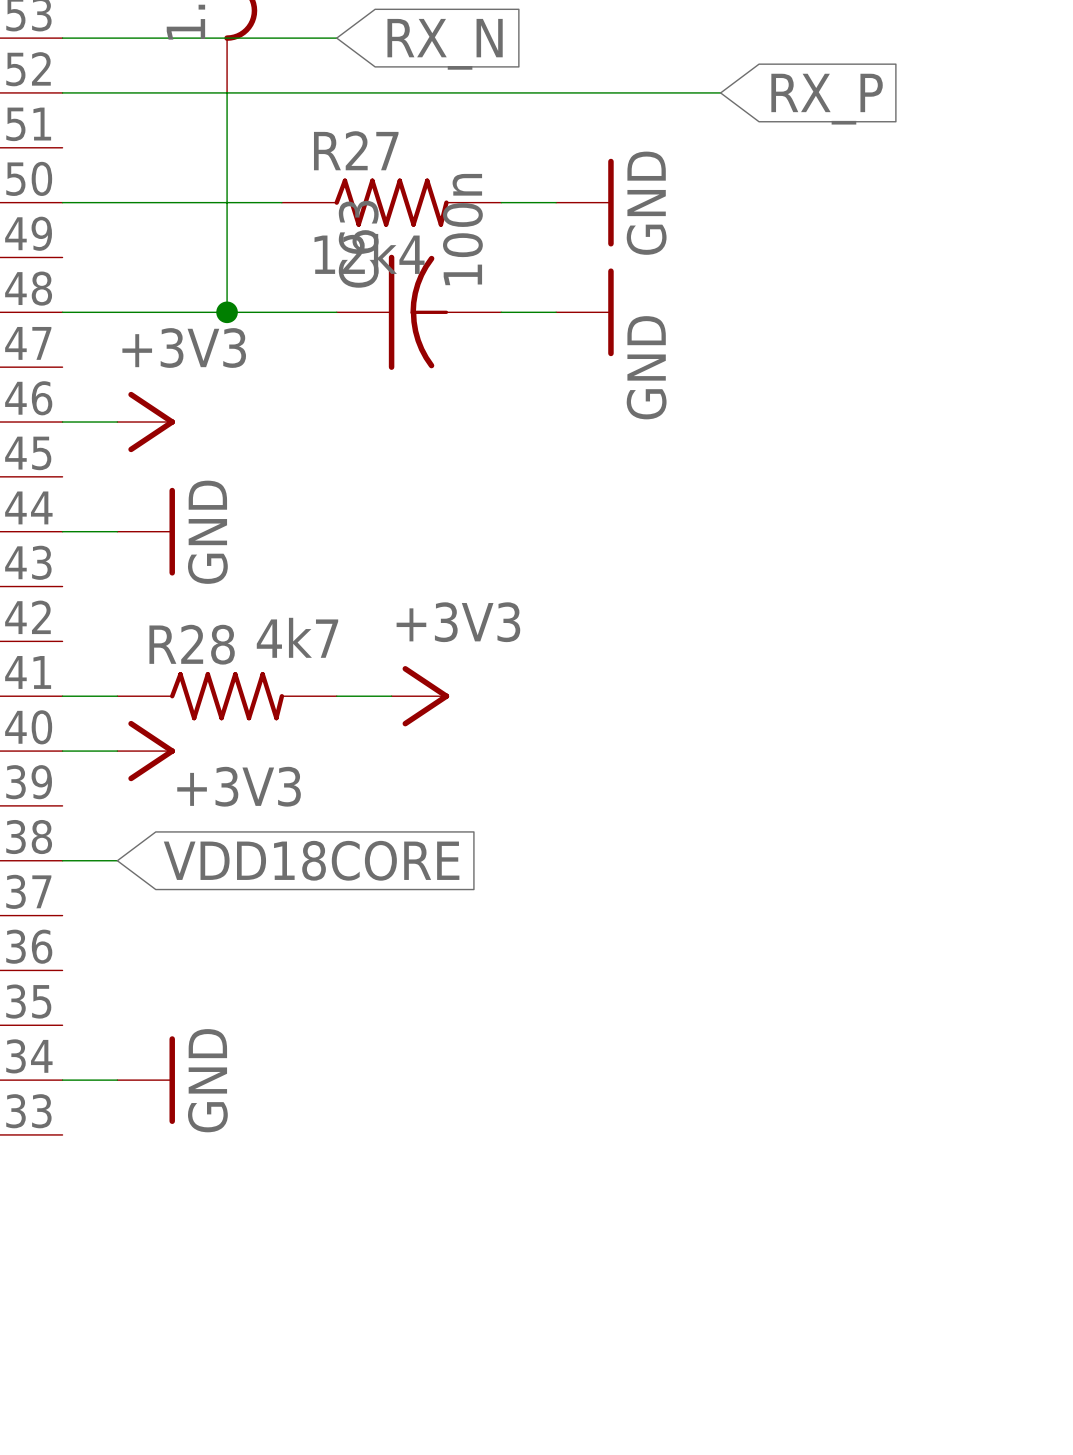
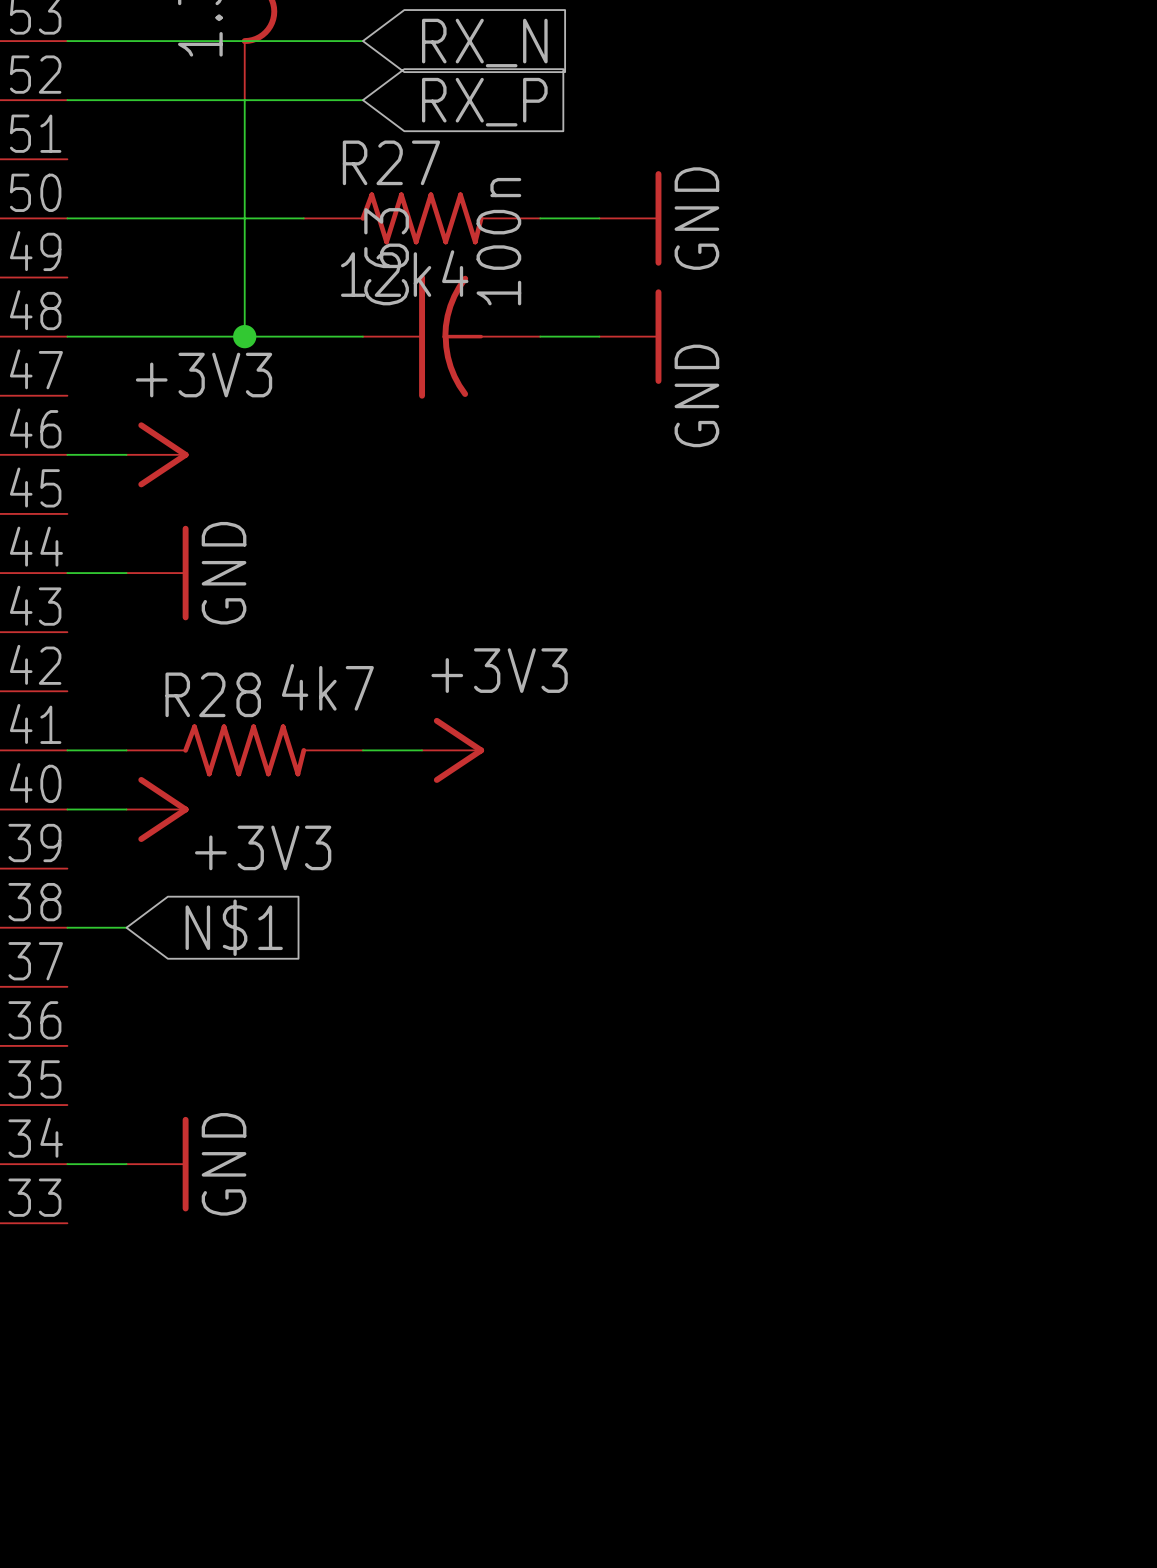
wire: (336, 92) (720, 92) -> none
global label position: RX_P (827, 99) -> RX_P (484, 102)
global label: VDD18CORE (311, 860) -> N$1 (234, 927)

